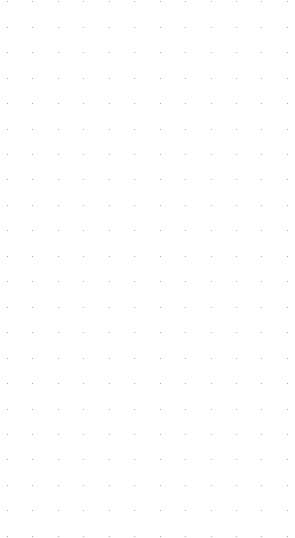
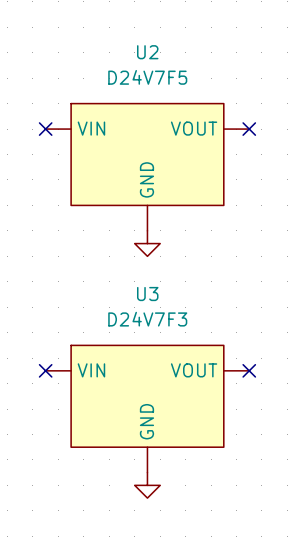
no-connect mark: none -> (45, 129)
no-connect mark: none -> (249, 129)
U2: none -> D24V7F5 (147, 167)
power symbol: none -> (147, 243)
no-connect mark: none -> (45, 370)
no-connect mark: none -> (249, 370)
U3: none -> D24V7F3 (147, 409)
power symbol: none -> (147, 485)

